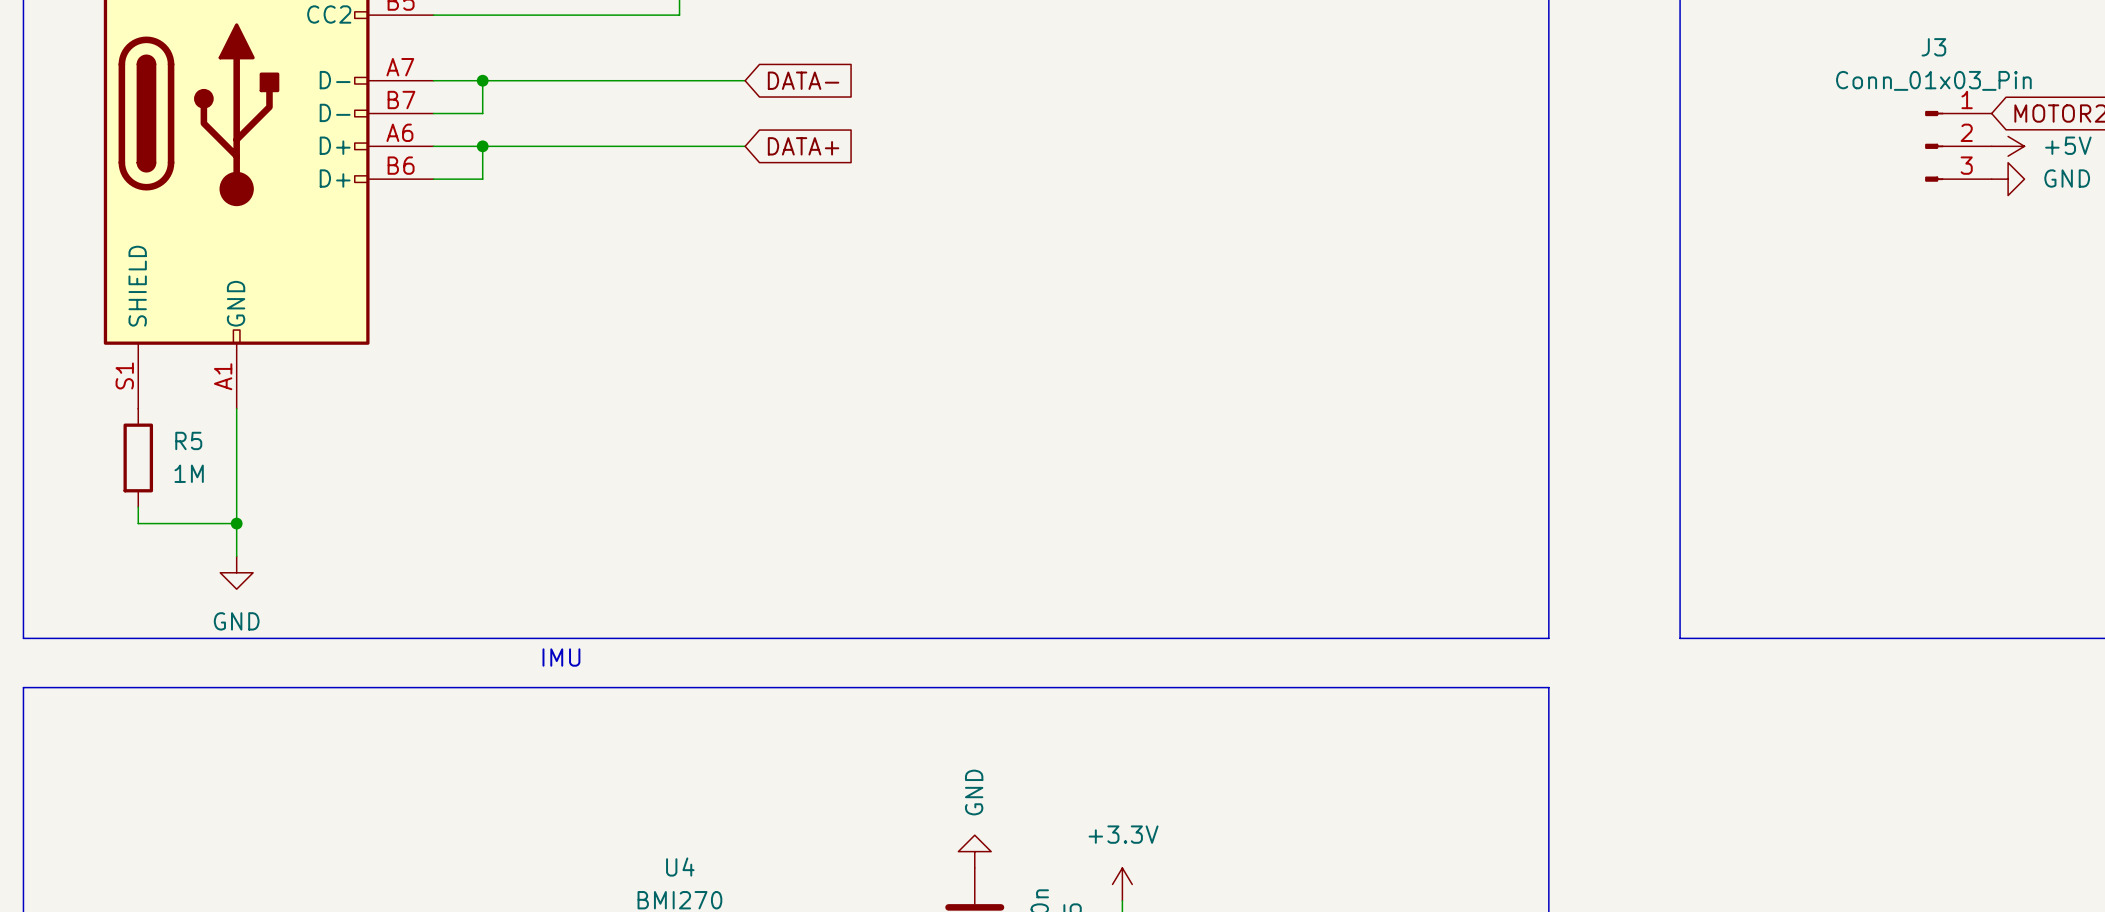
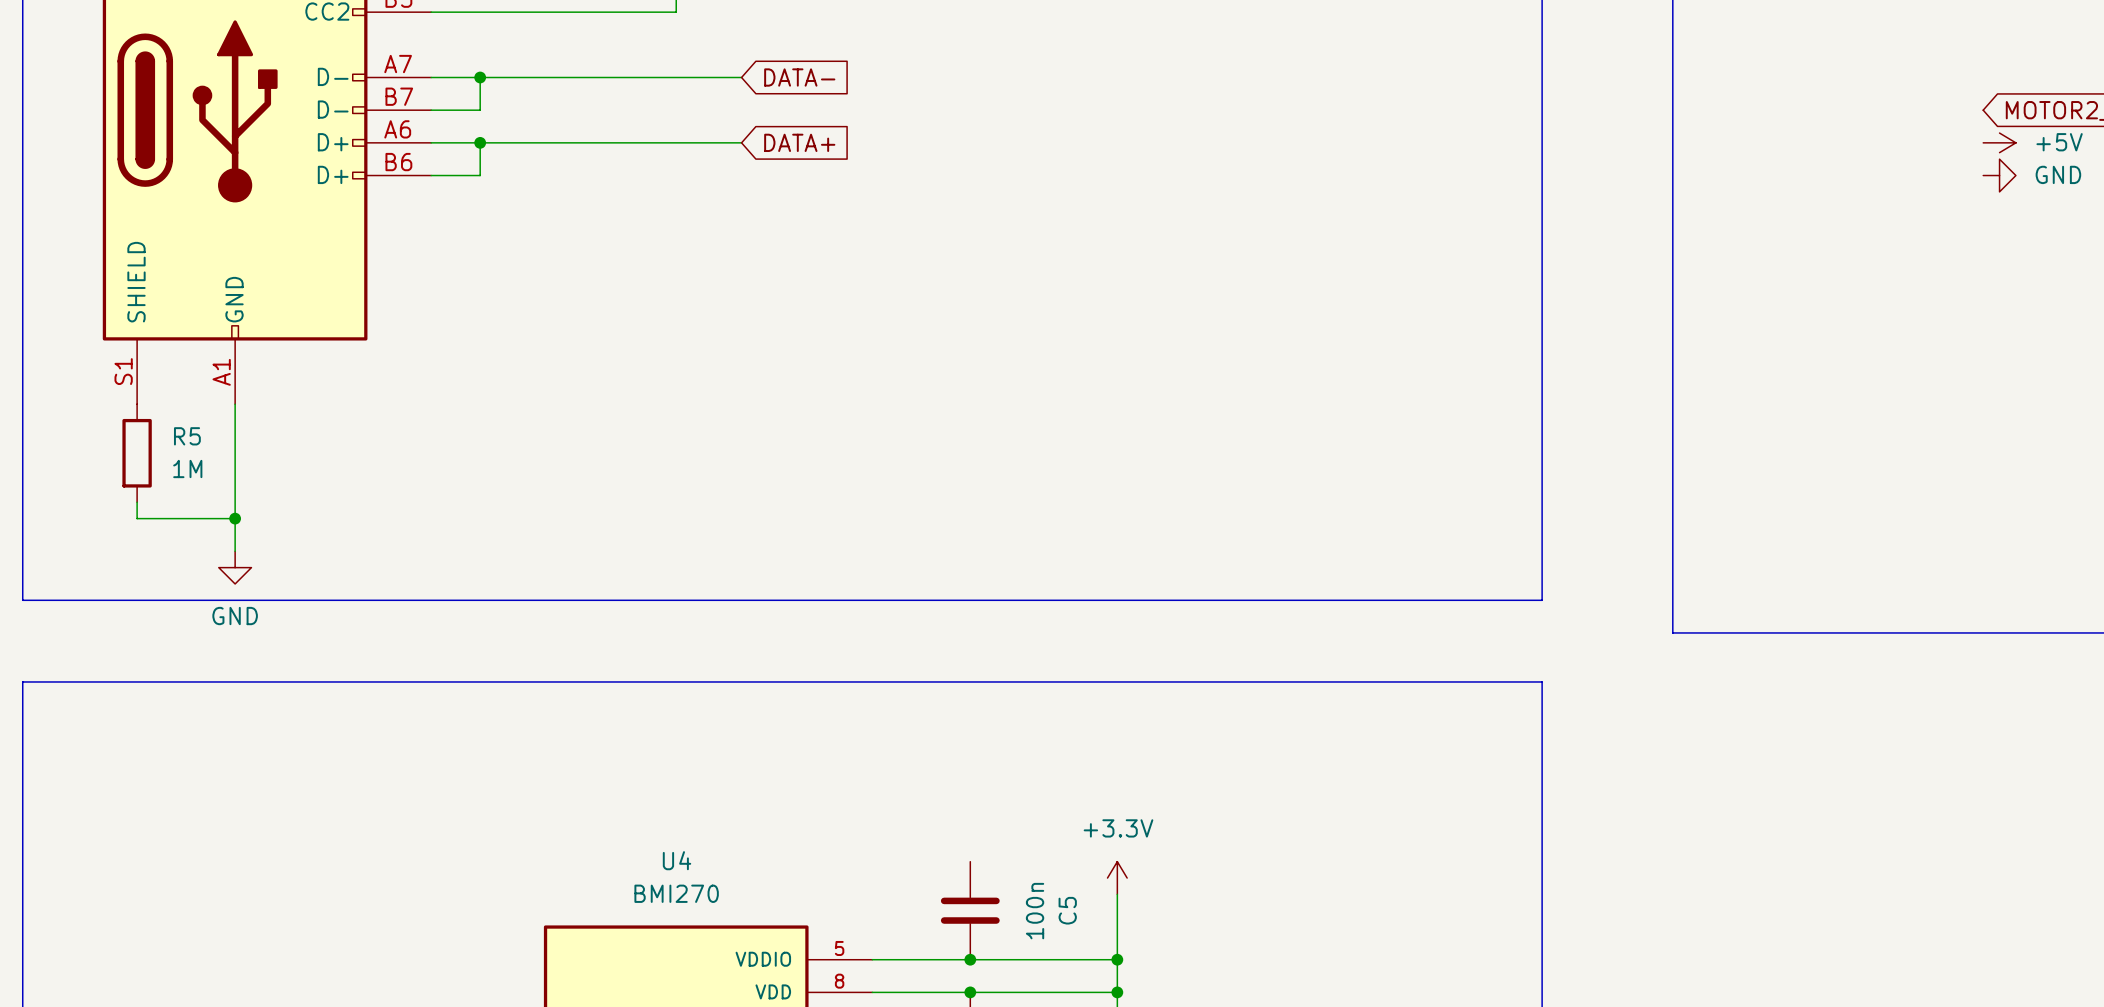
J3: Conn_01x03_Pin (1958, 146) -> none
line: (23, 605) (23, 638) (1548, 638) (1548, 605) -> (22, 600) (1542, 600)
text: IMU (561, 657) -> none
power symbol: GND (974, 851) -> none

